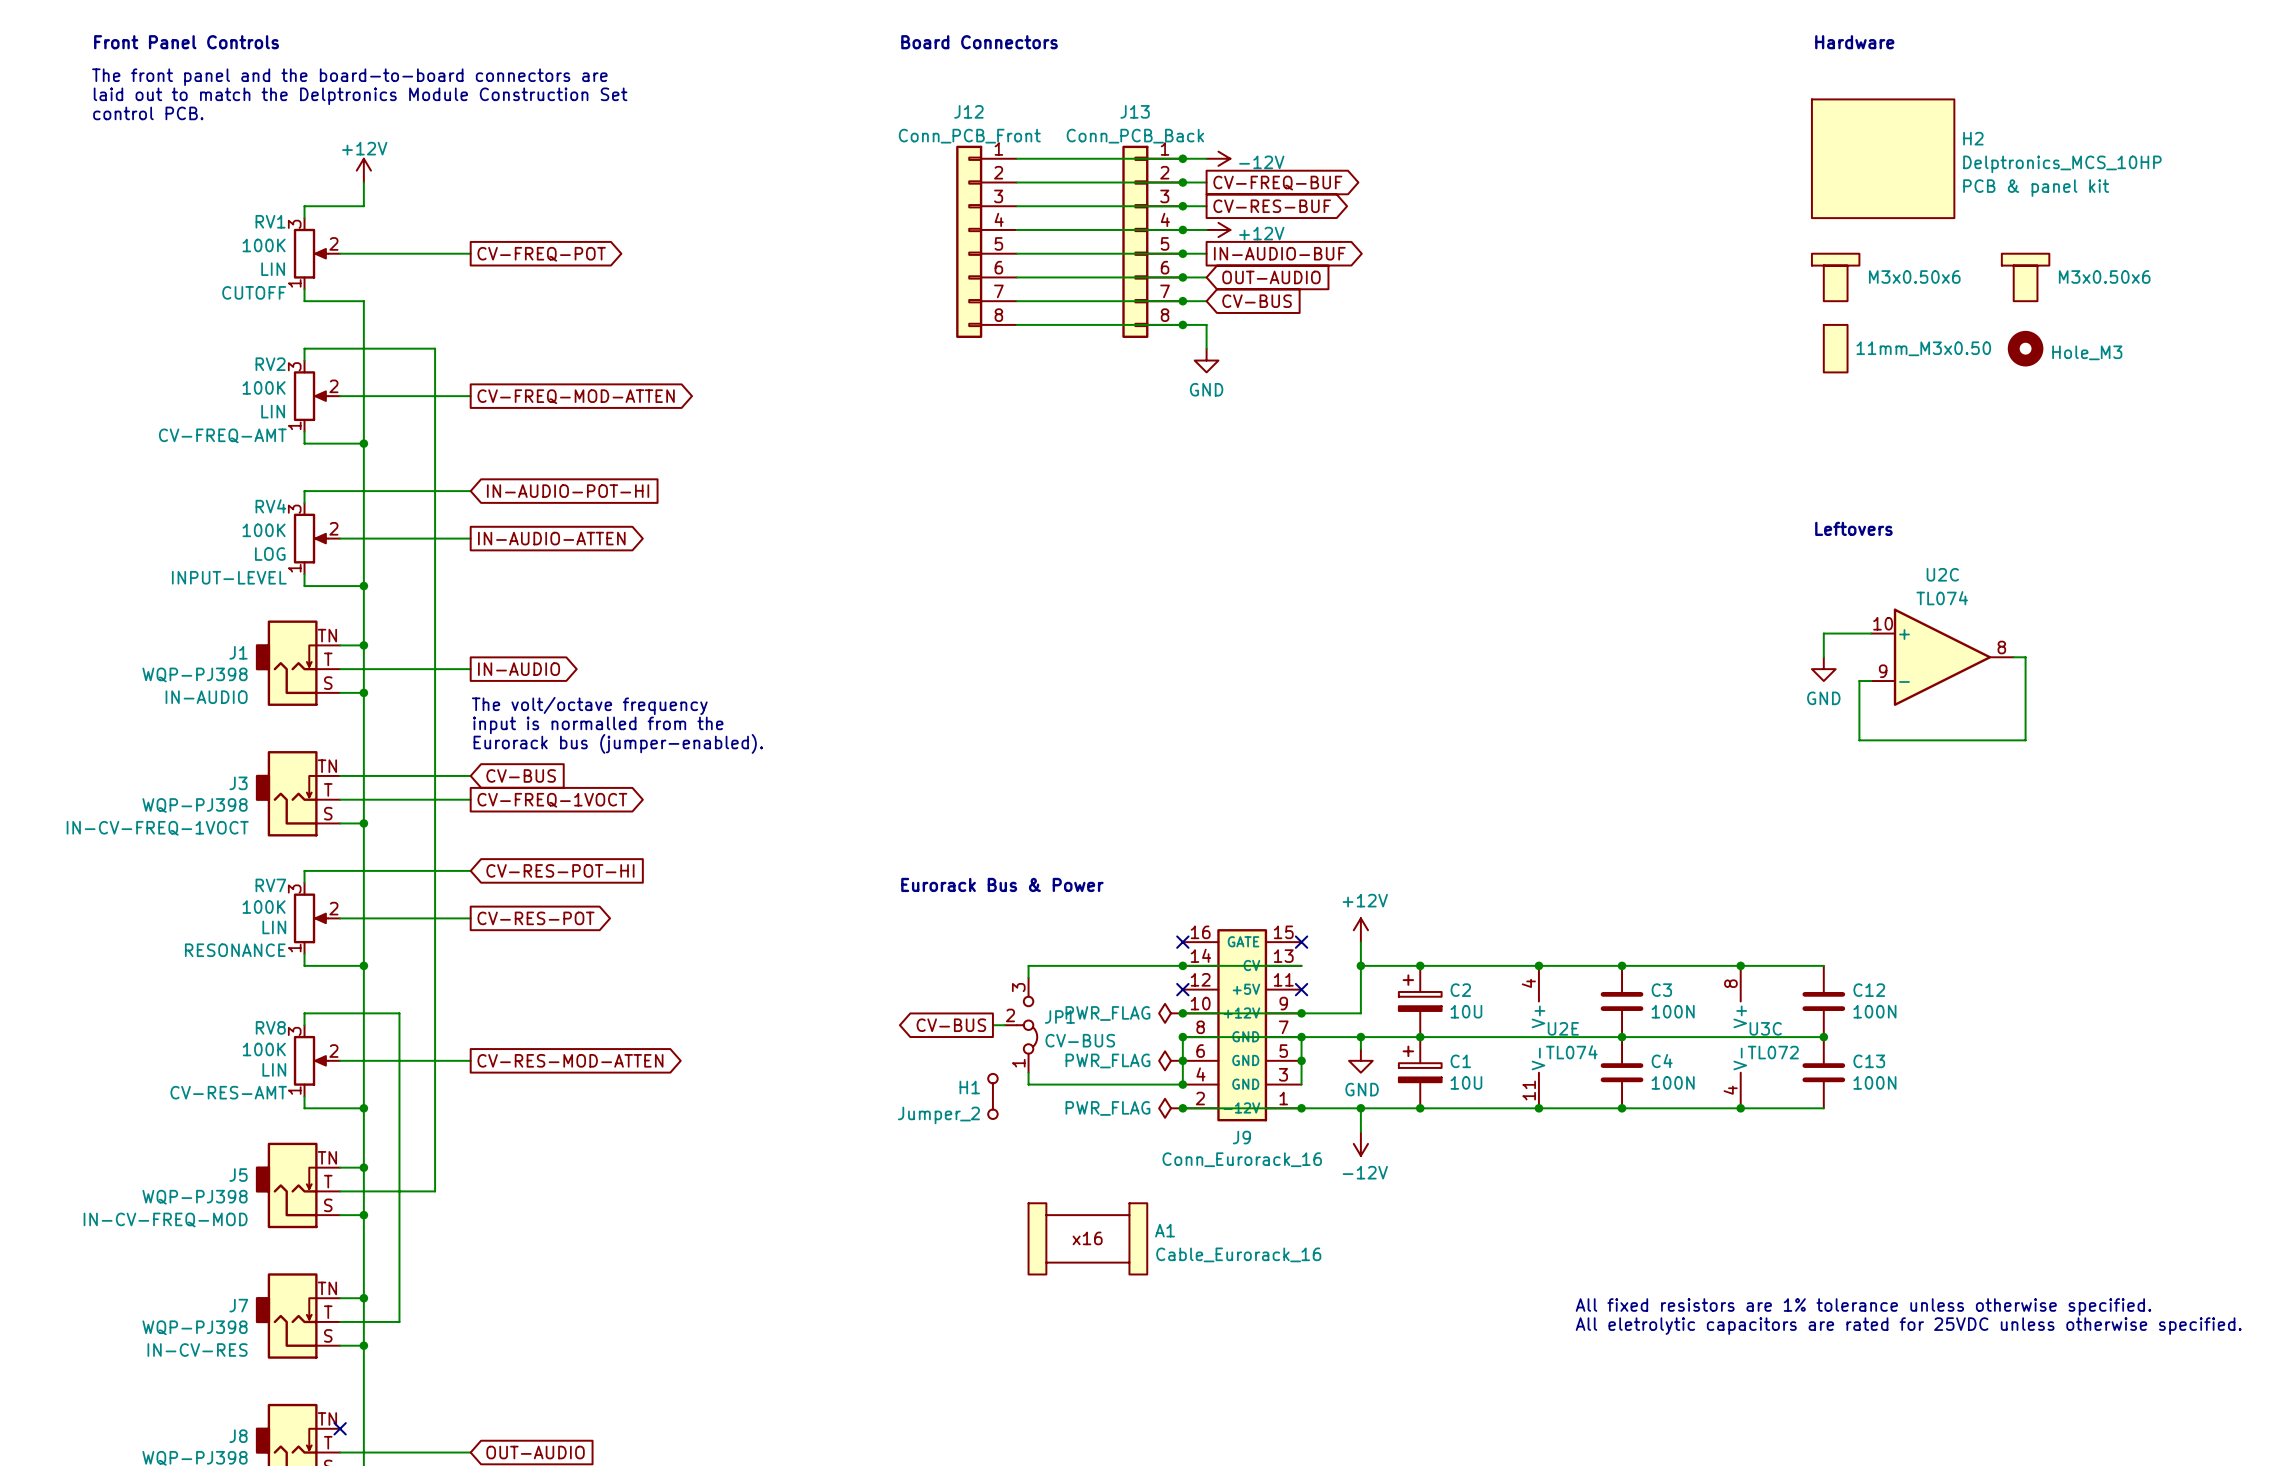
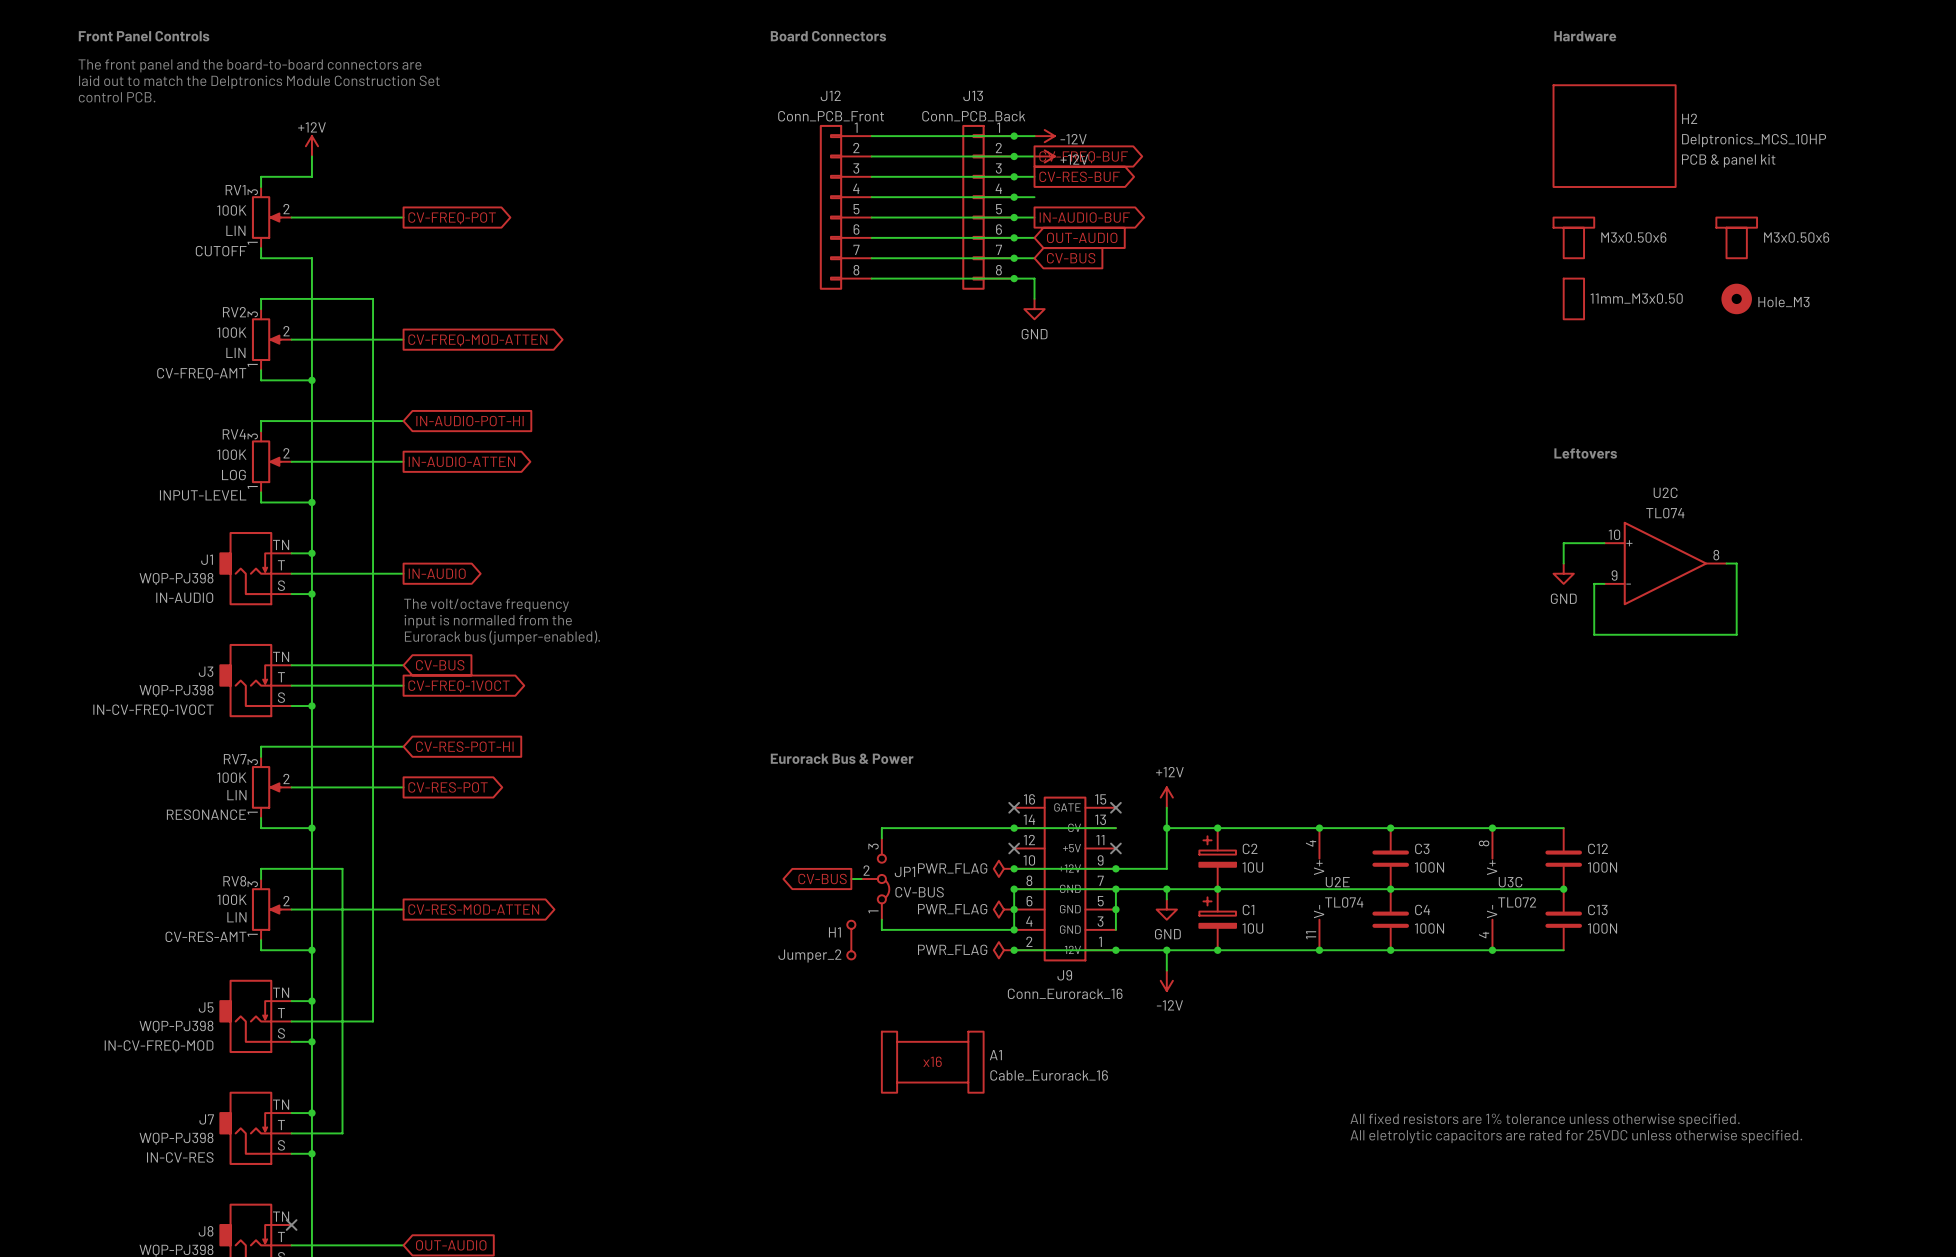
power symbol position: +12V (1218, 229) -> +12V (1044, 156)

